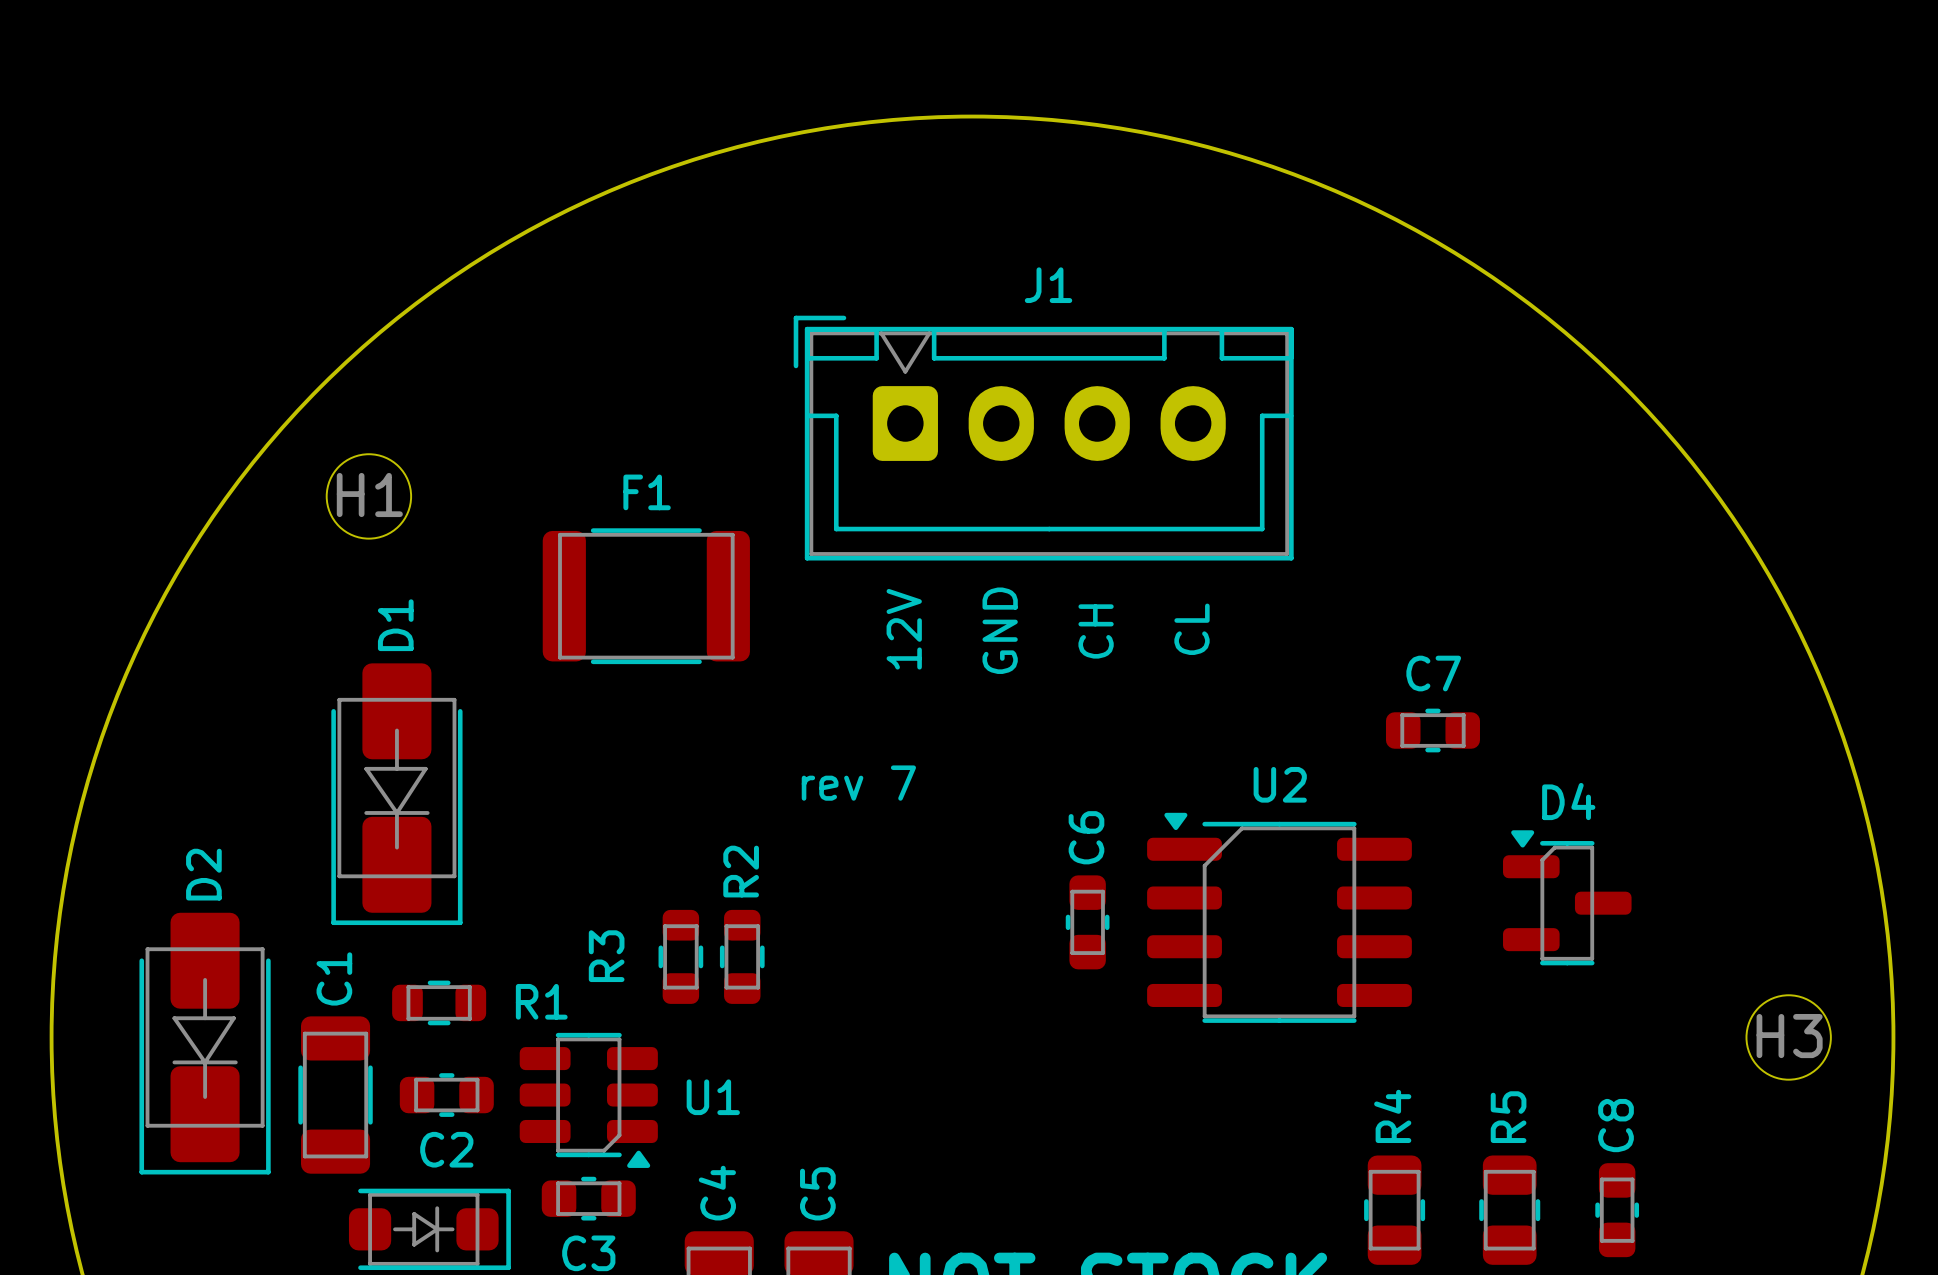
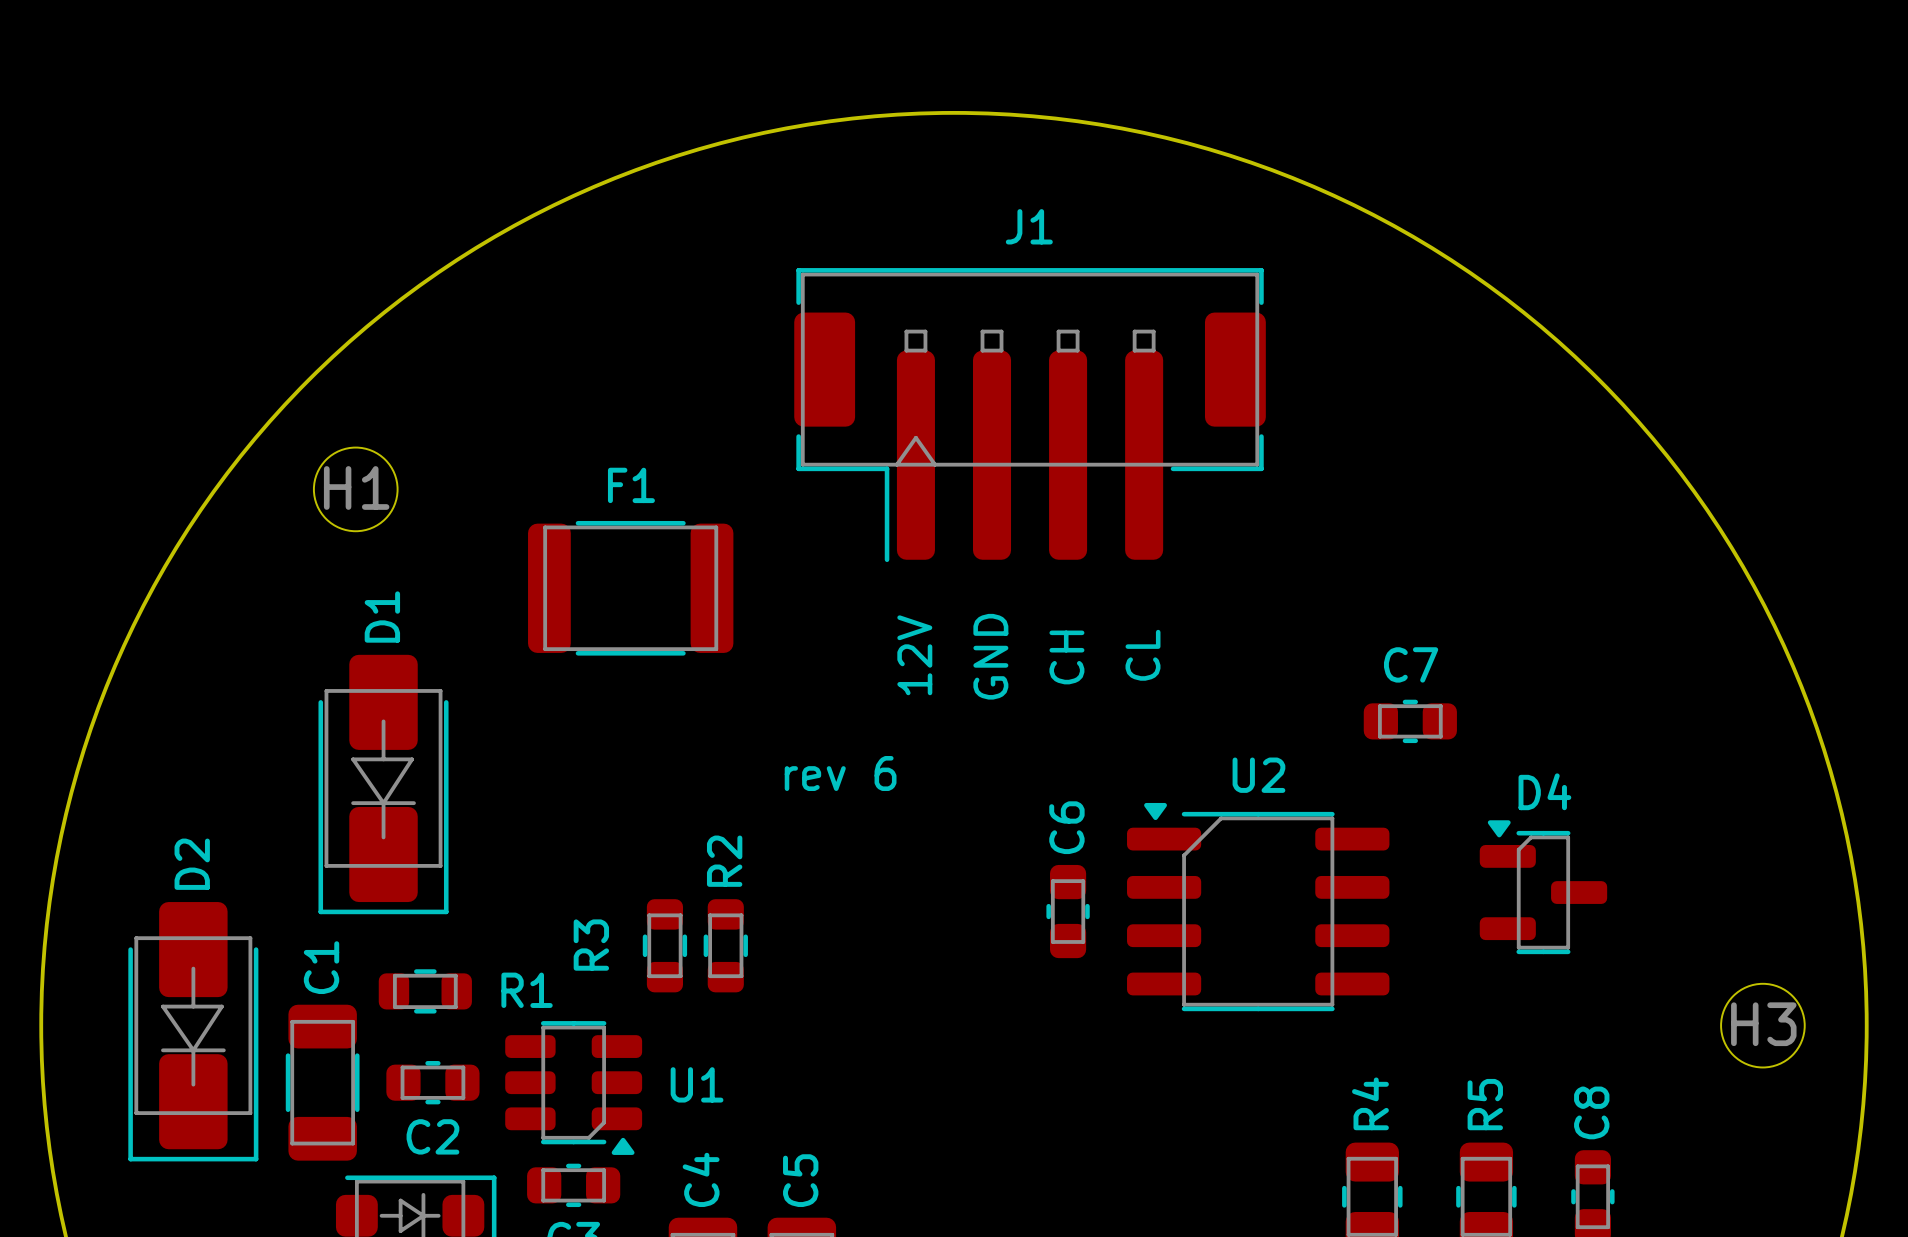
J1 footprint: [793, 315, 1294, 561] -> [794, 268, 1266, 563]
text position: 12V (904, 629) -> 12V (914, 655)
text position: CL (1192, 629) -> CL (1142, 655)
text position: GND (1000, 630) -> GND (990, 656)
text position: CH (1096, 631) -> CH (1066, 657)
text: rev 7 (858, 783) -> rev 6 (840, 773)

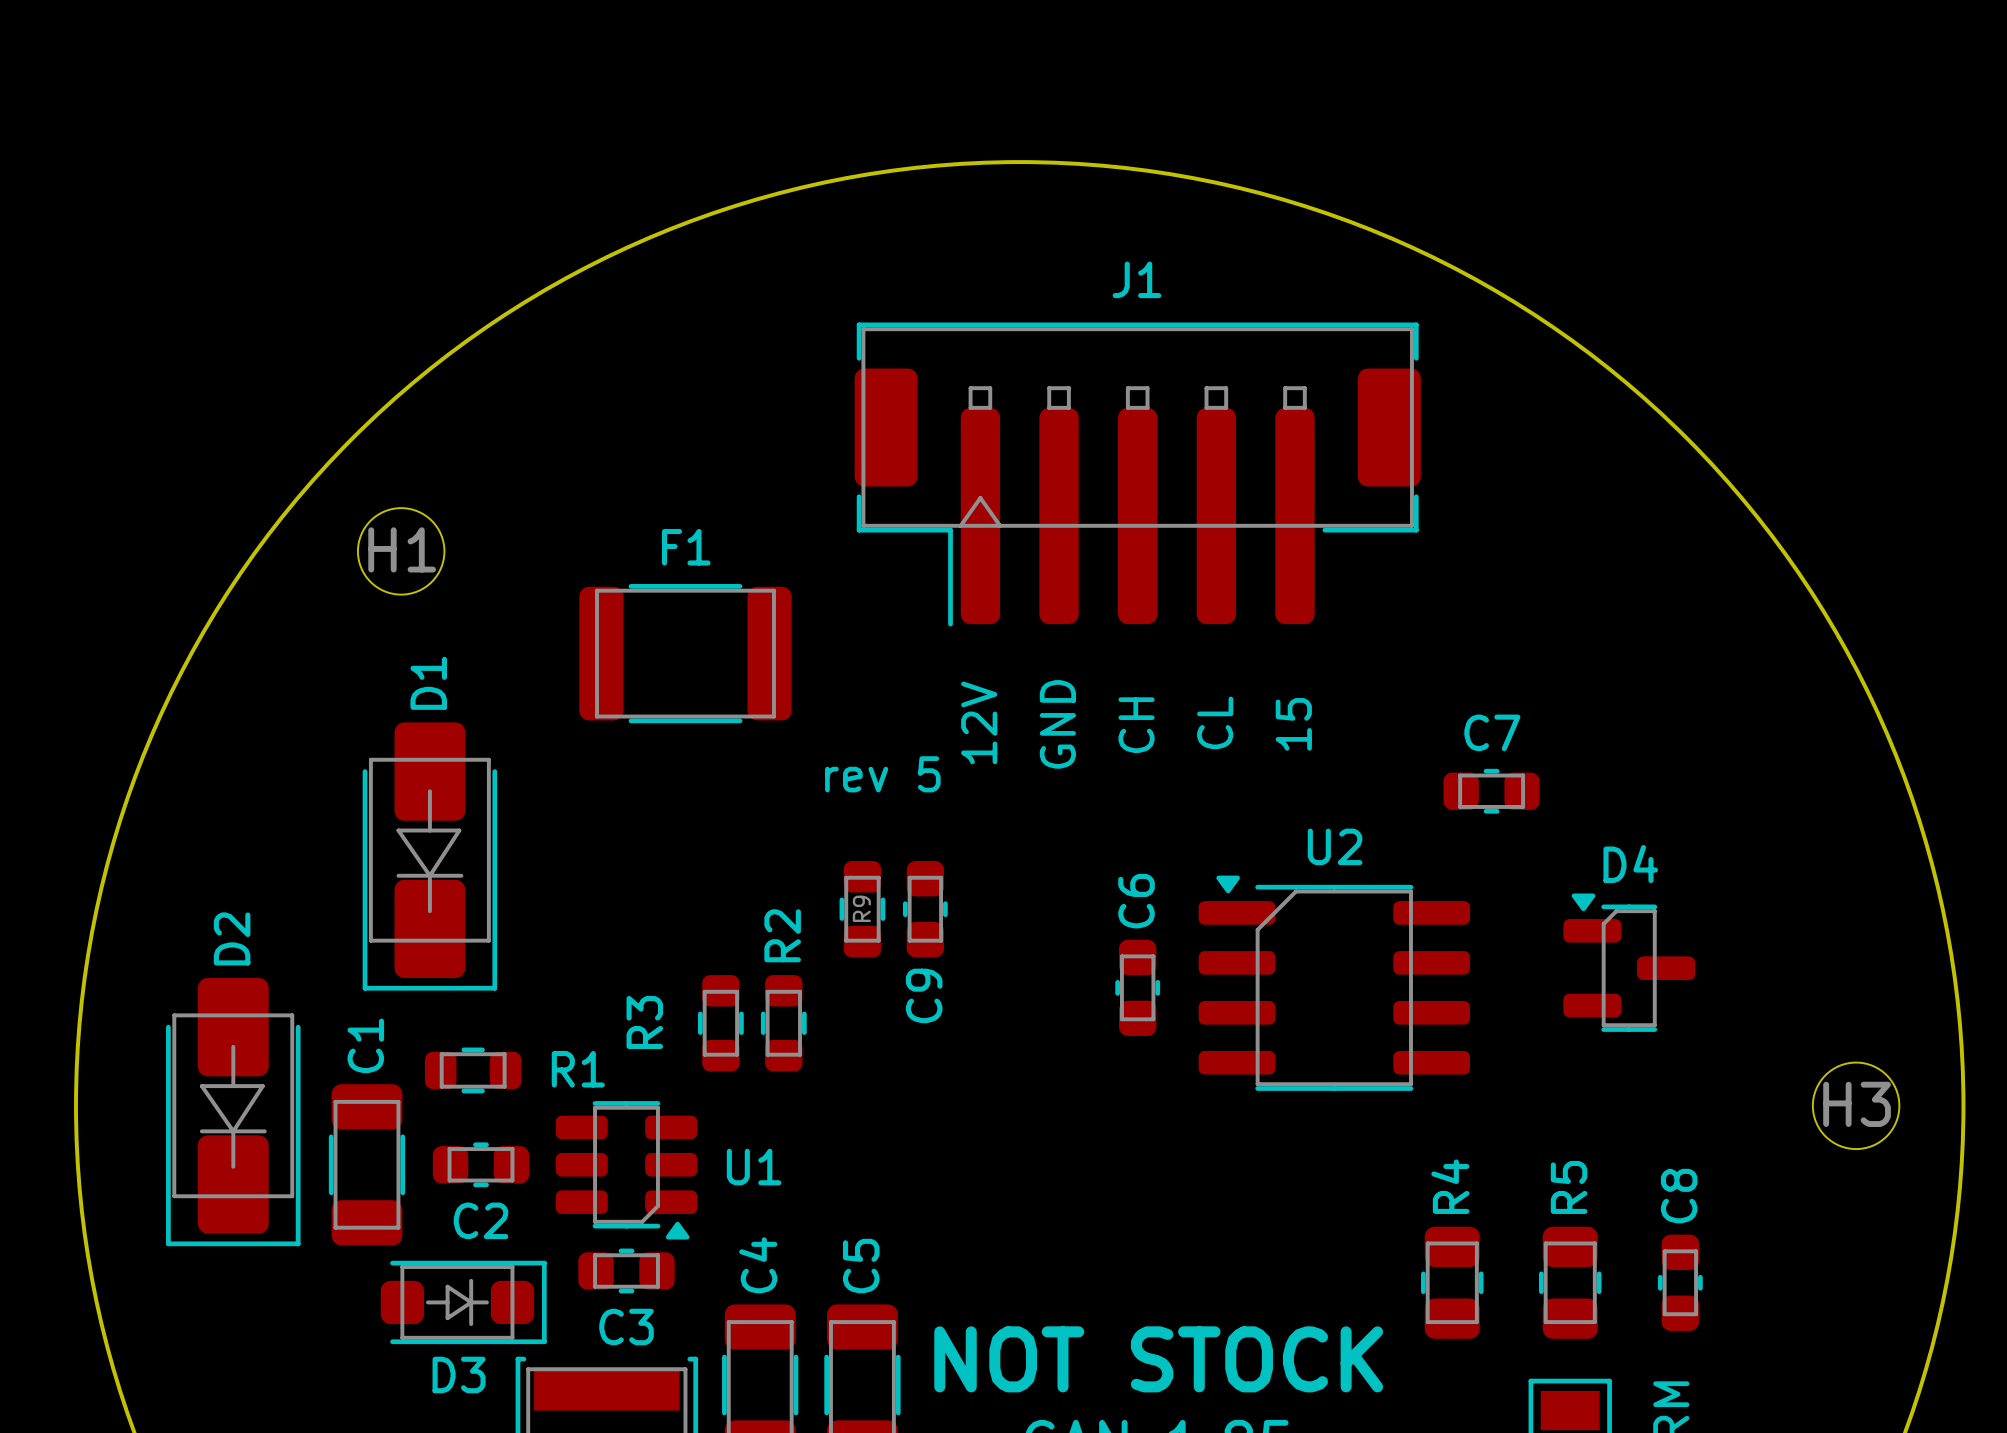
J1 footprint: [794, 268, 1266, 563] -> [854, 322, 1421, 627]
text: none -> 15 (1293, 724)
text: none -> rev 5 (882, 774)
text: rev 6 (840, 773) -> none
R9: none -> (862, 909)
C9: none -> (925, 909)

